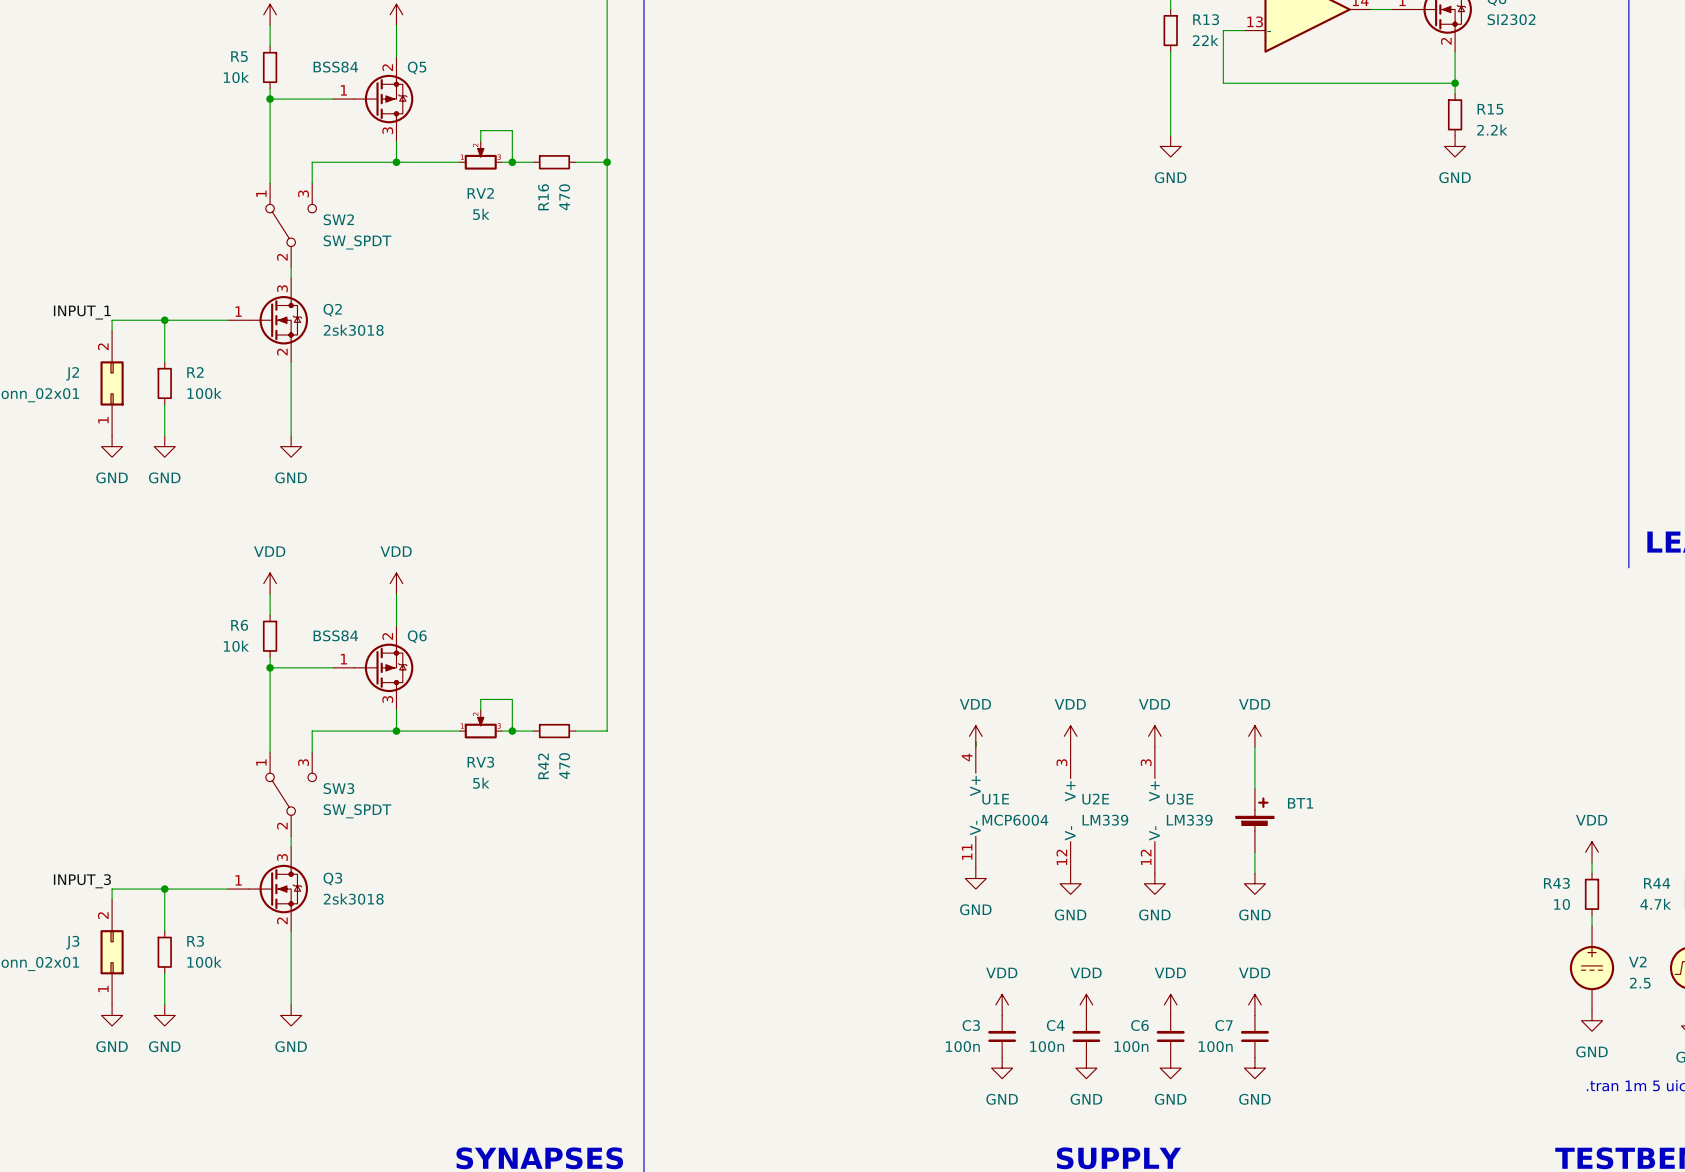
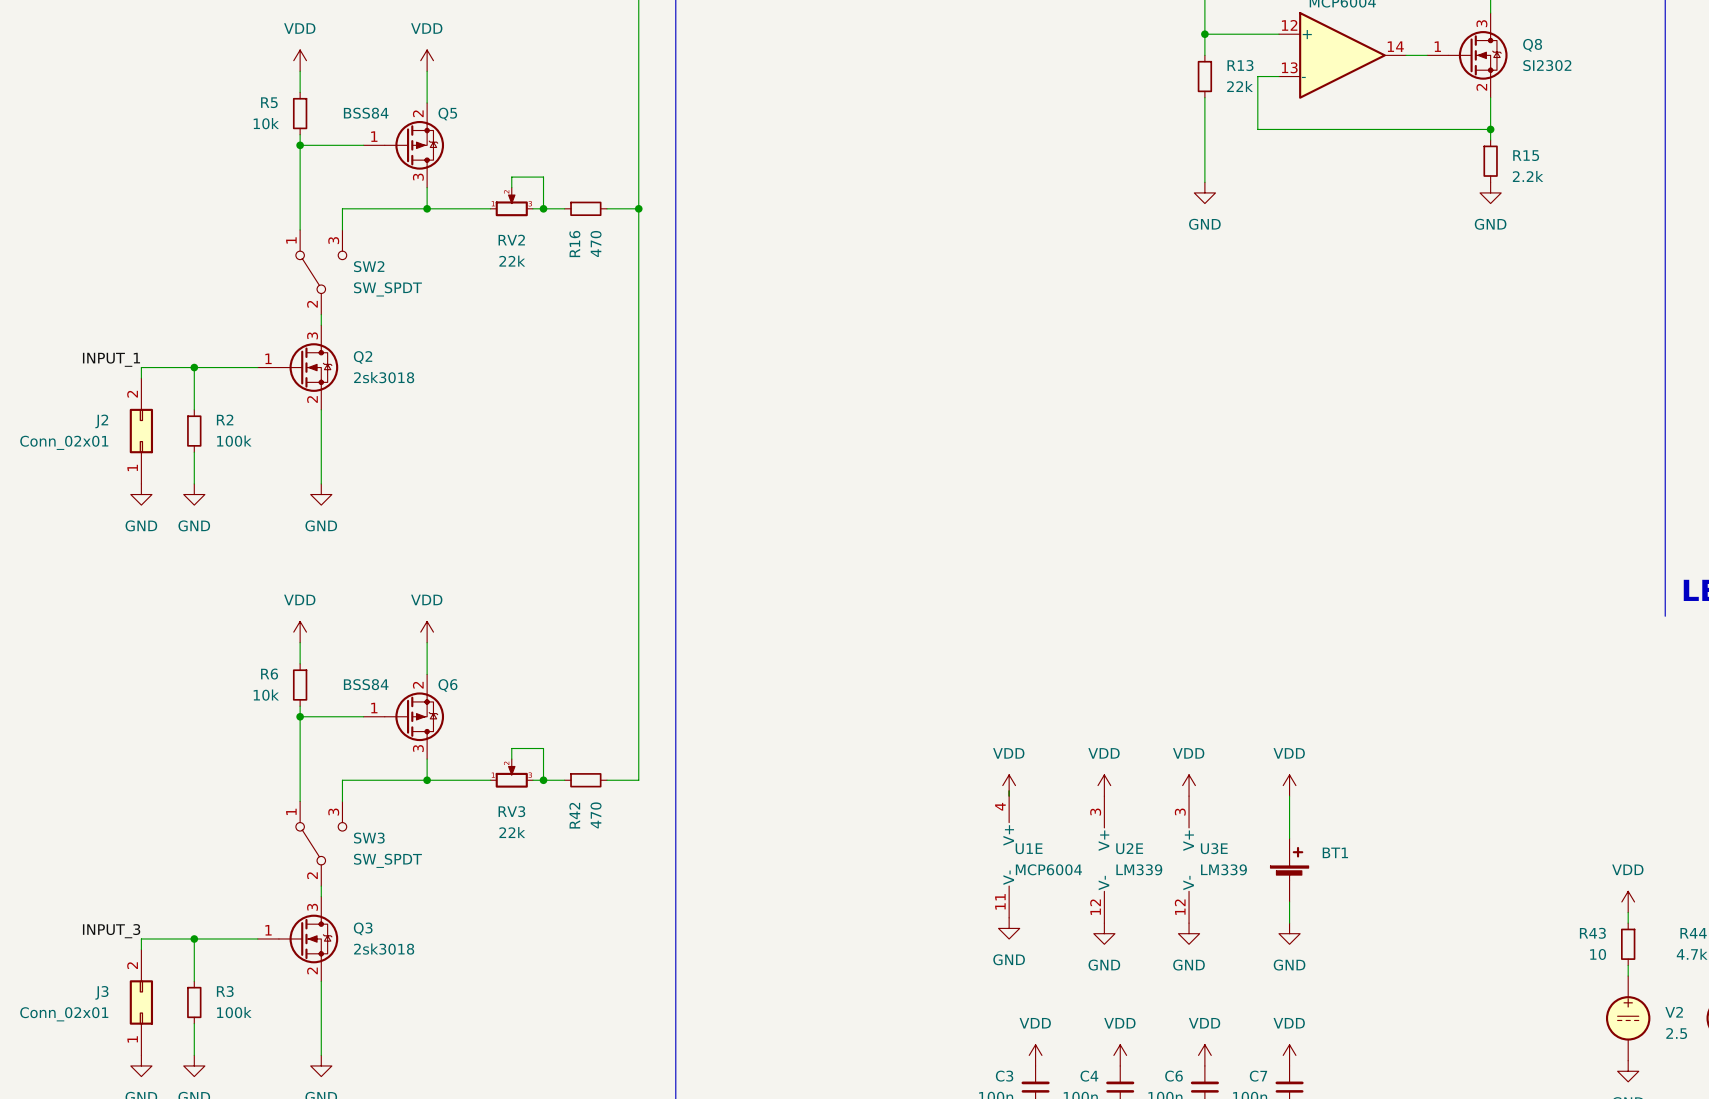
RV2 value: 5k (481, 214) -> 22k (512, 261)
RV3 value: 5k (481, 783) -> 22k (512, 832)

